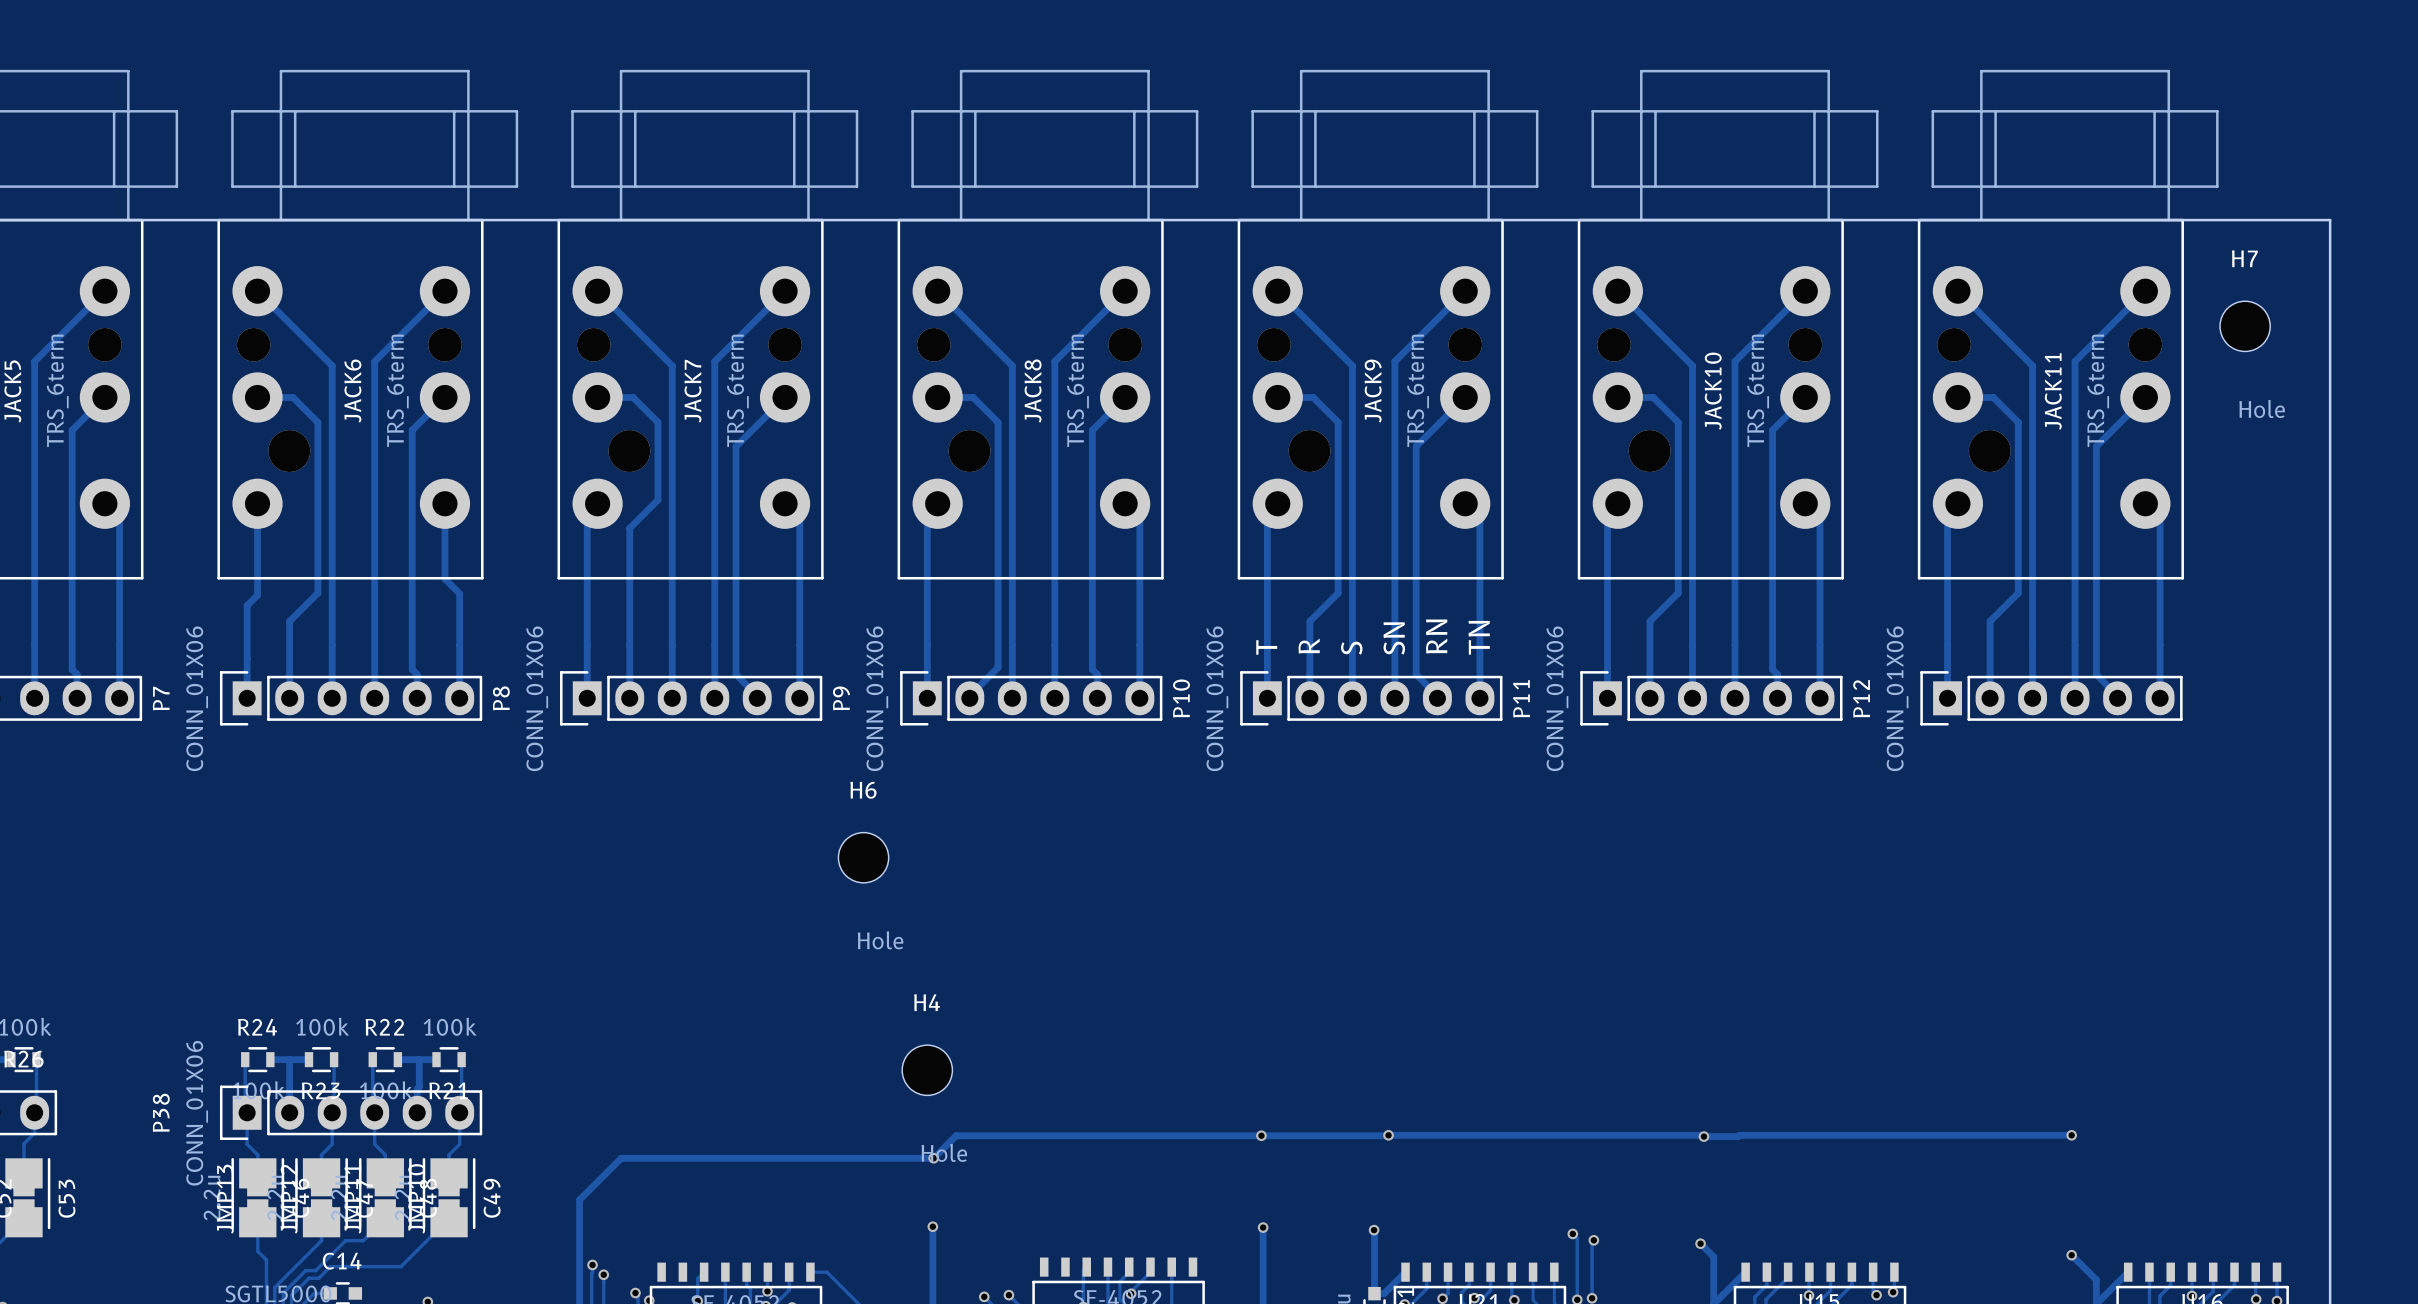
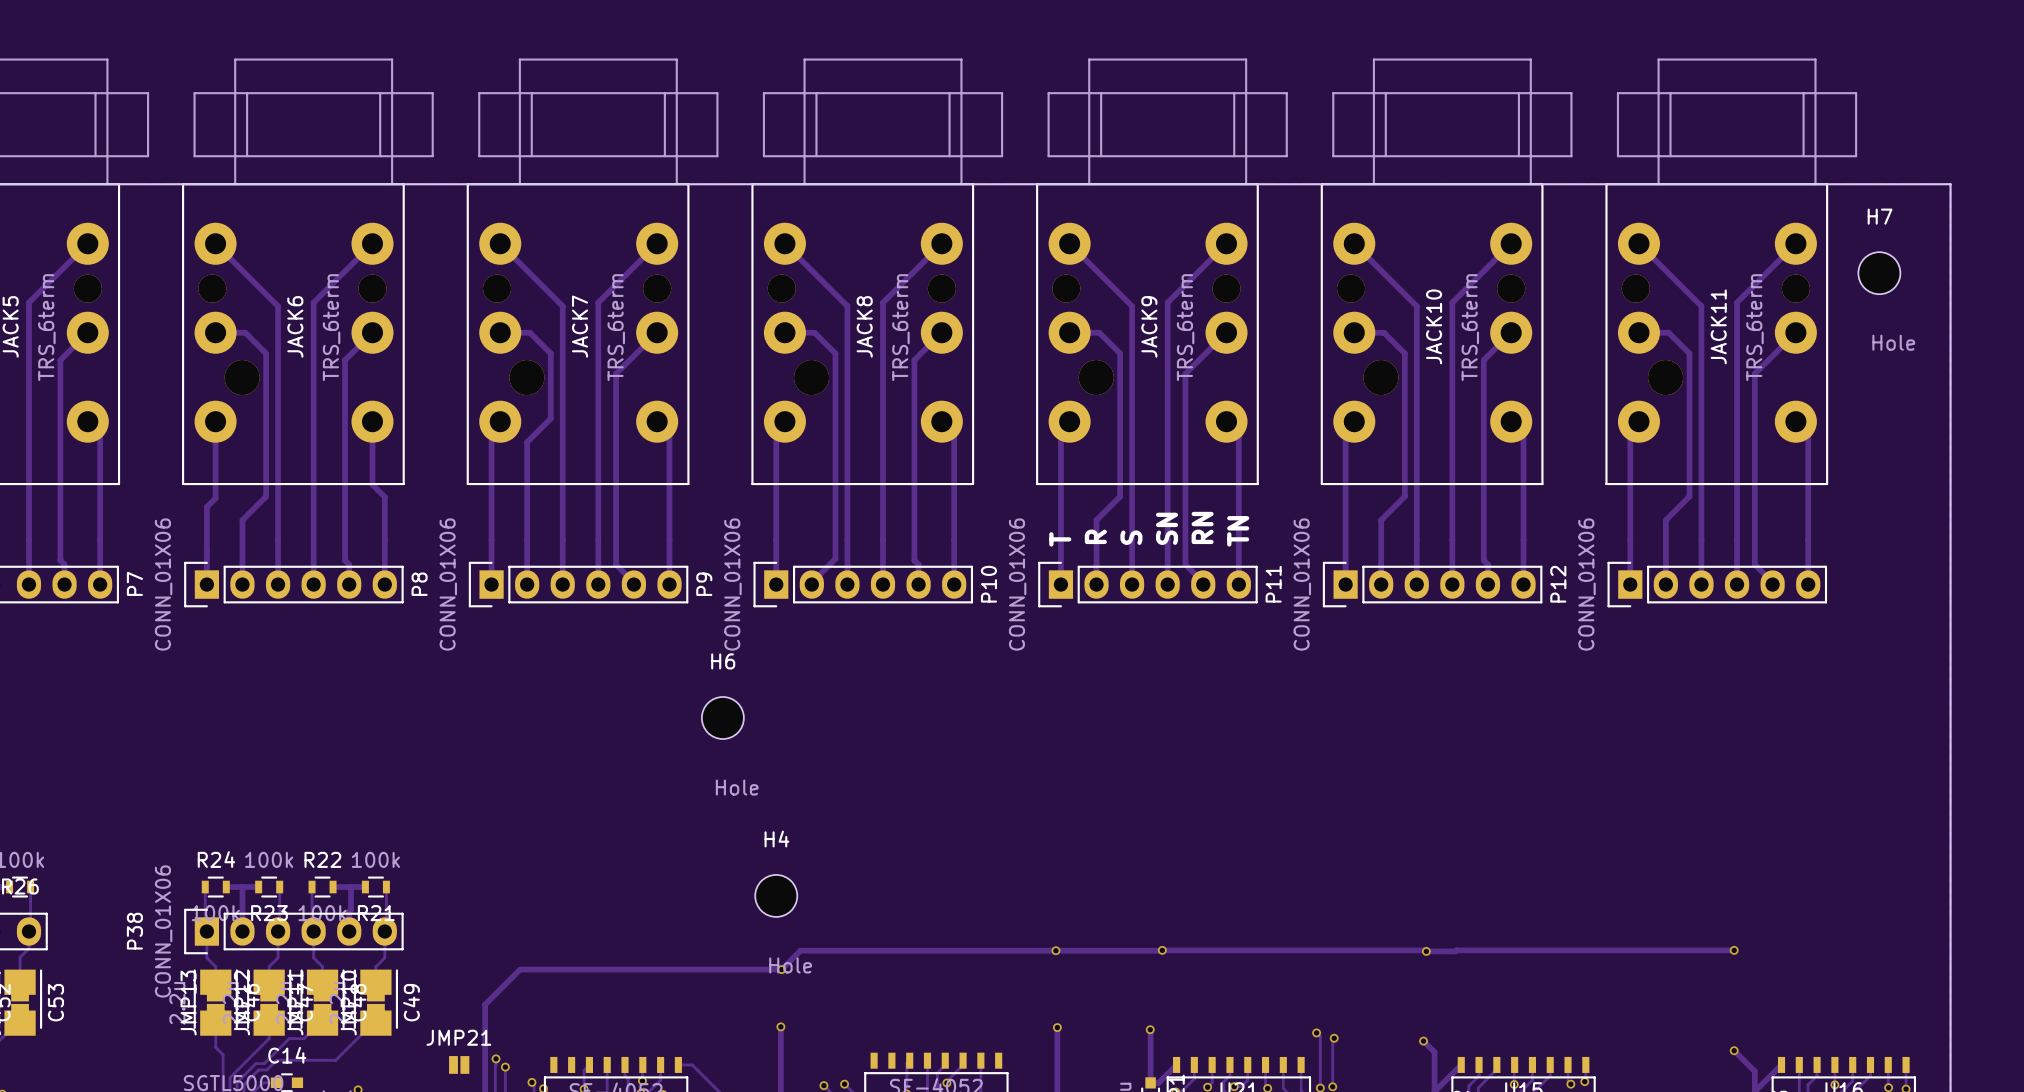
JMP21: none -> (459, 1064)

